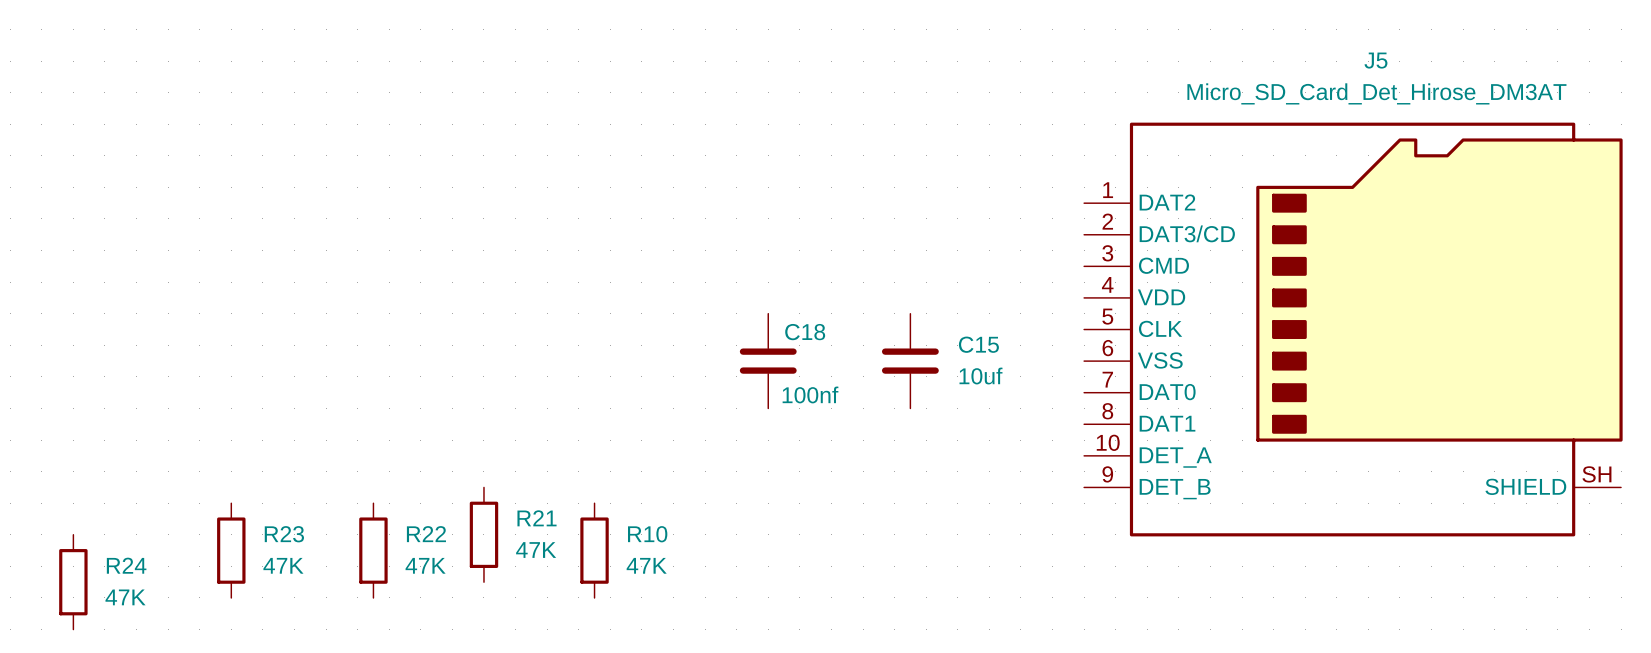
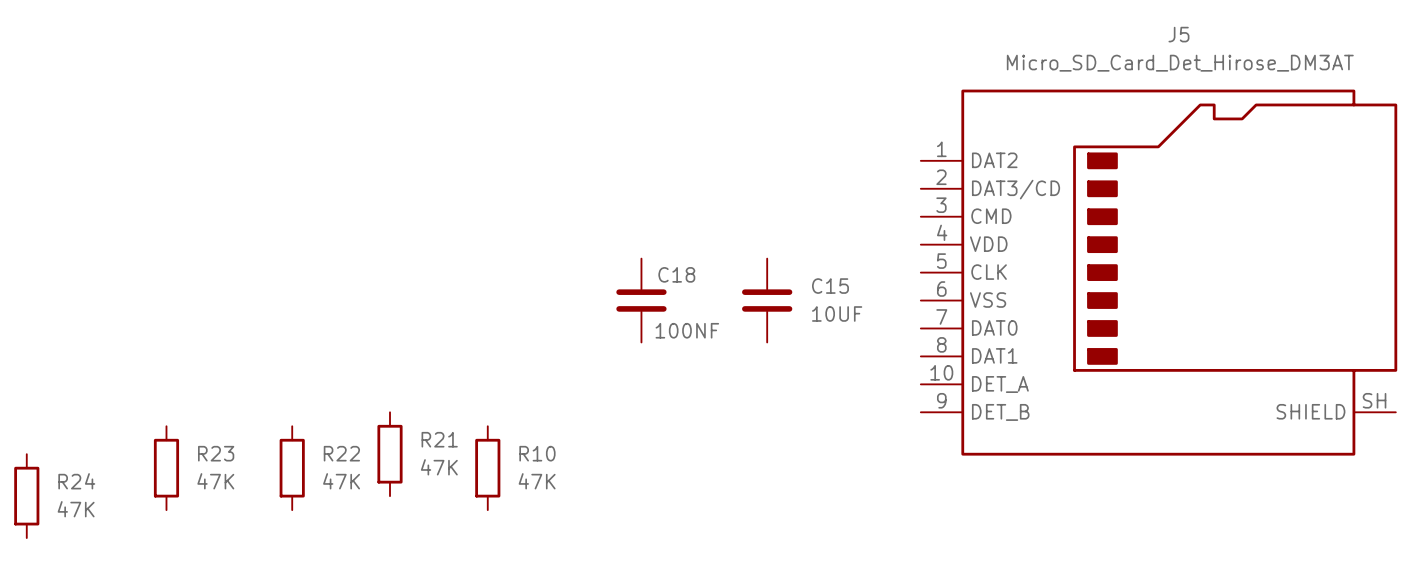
C15 value: 10uf (980, 376) -> 10UF (837, 313)
C18 value: 100nf (810, 394) -> 100NF (687, 330)

